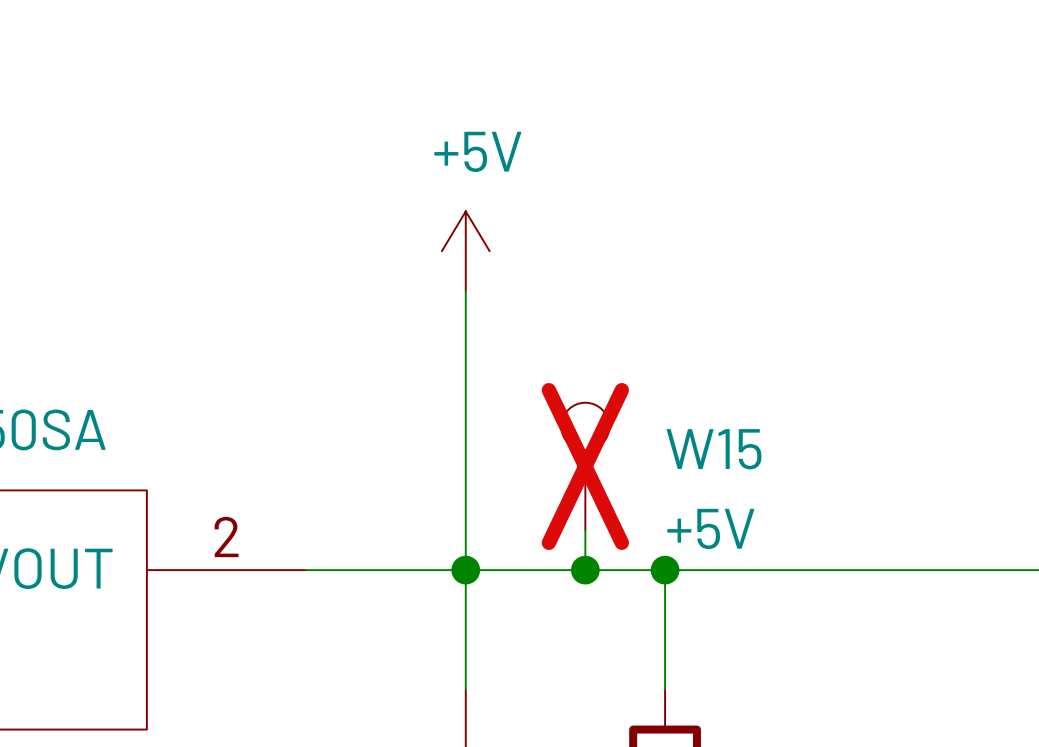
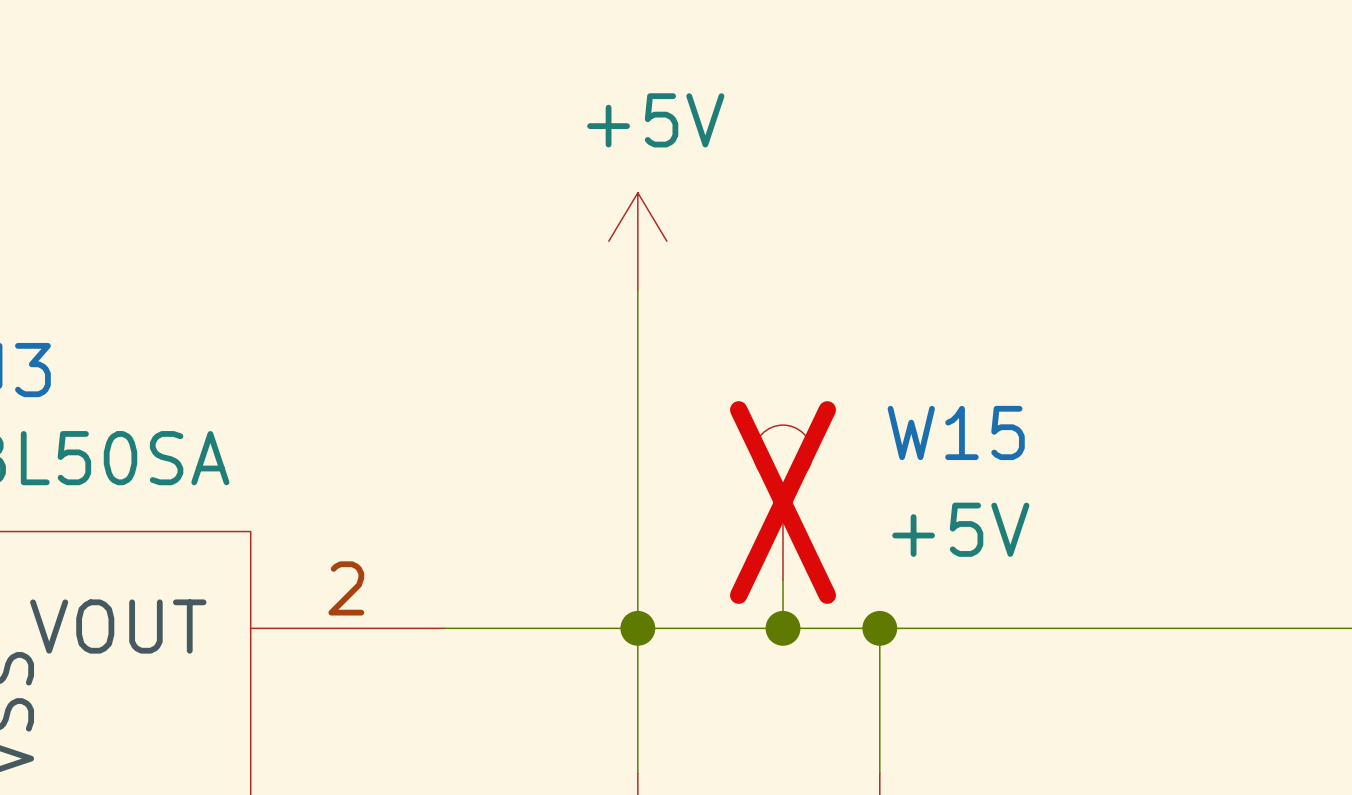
W15 name position: W15 (714, 449) -> W15 (956, 432)
W15 value position: +5V (710, 528) -> +5V (960, 529)

